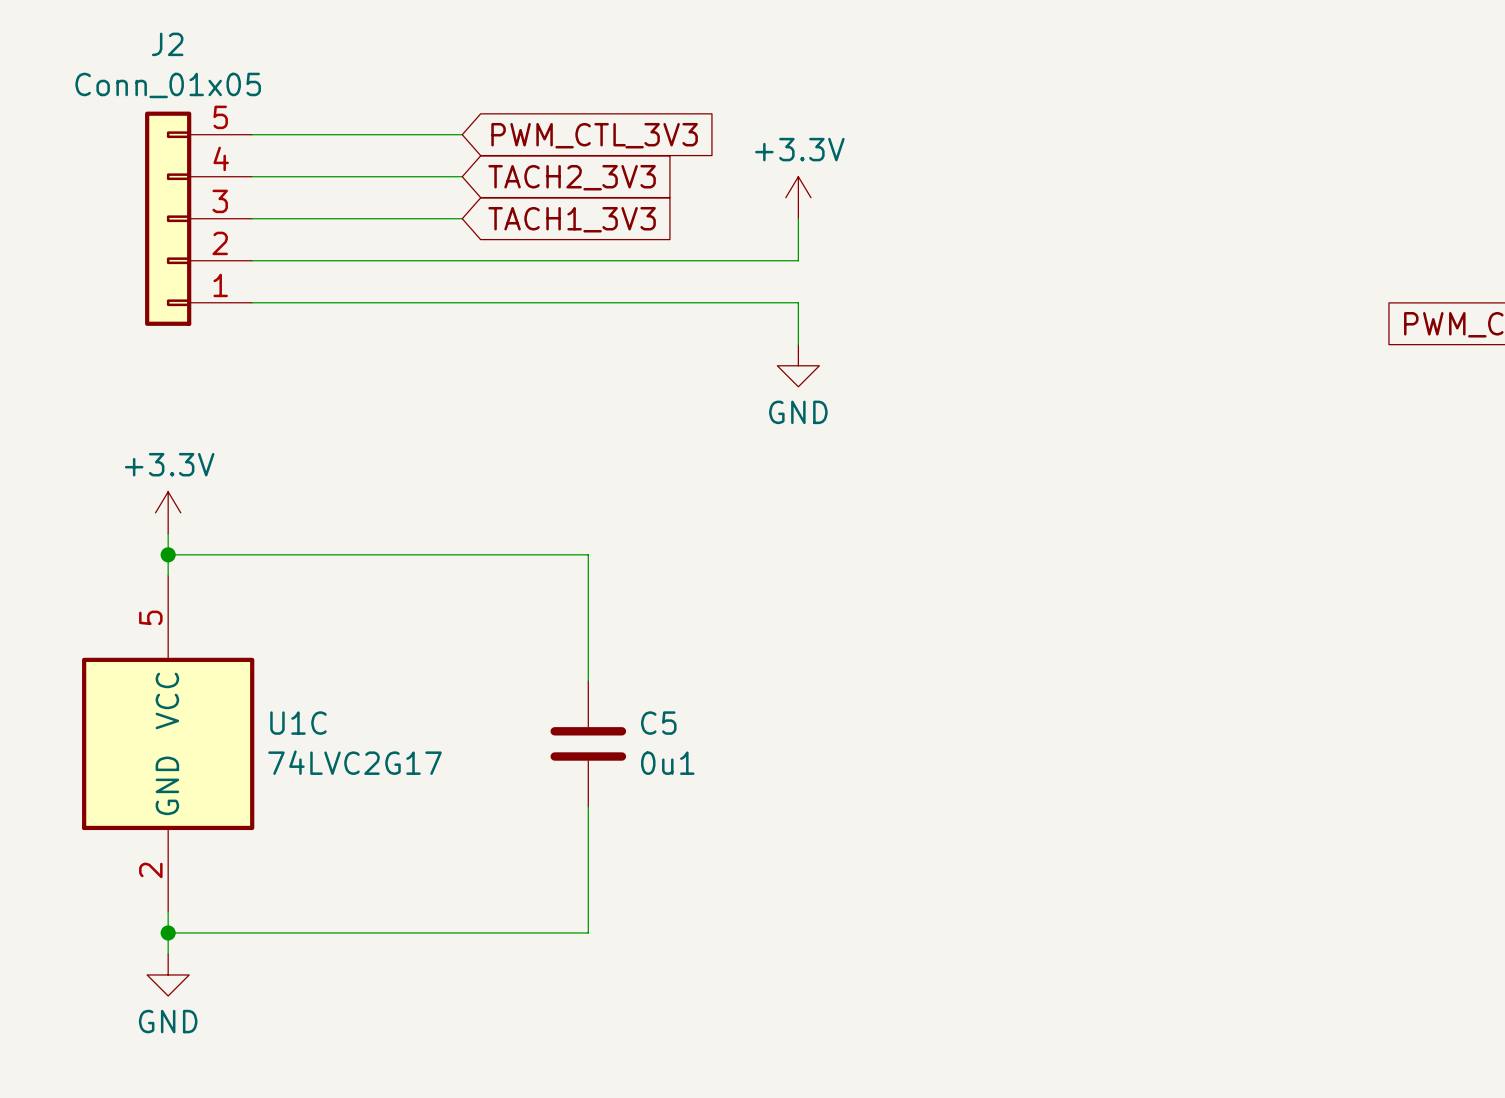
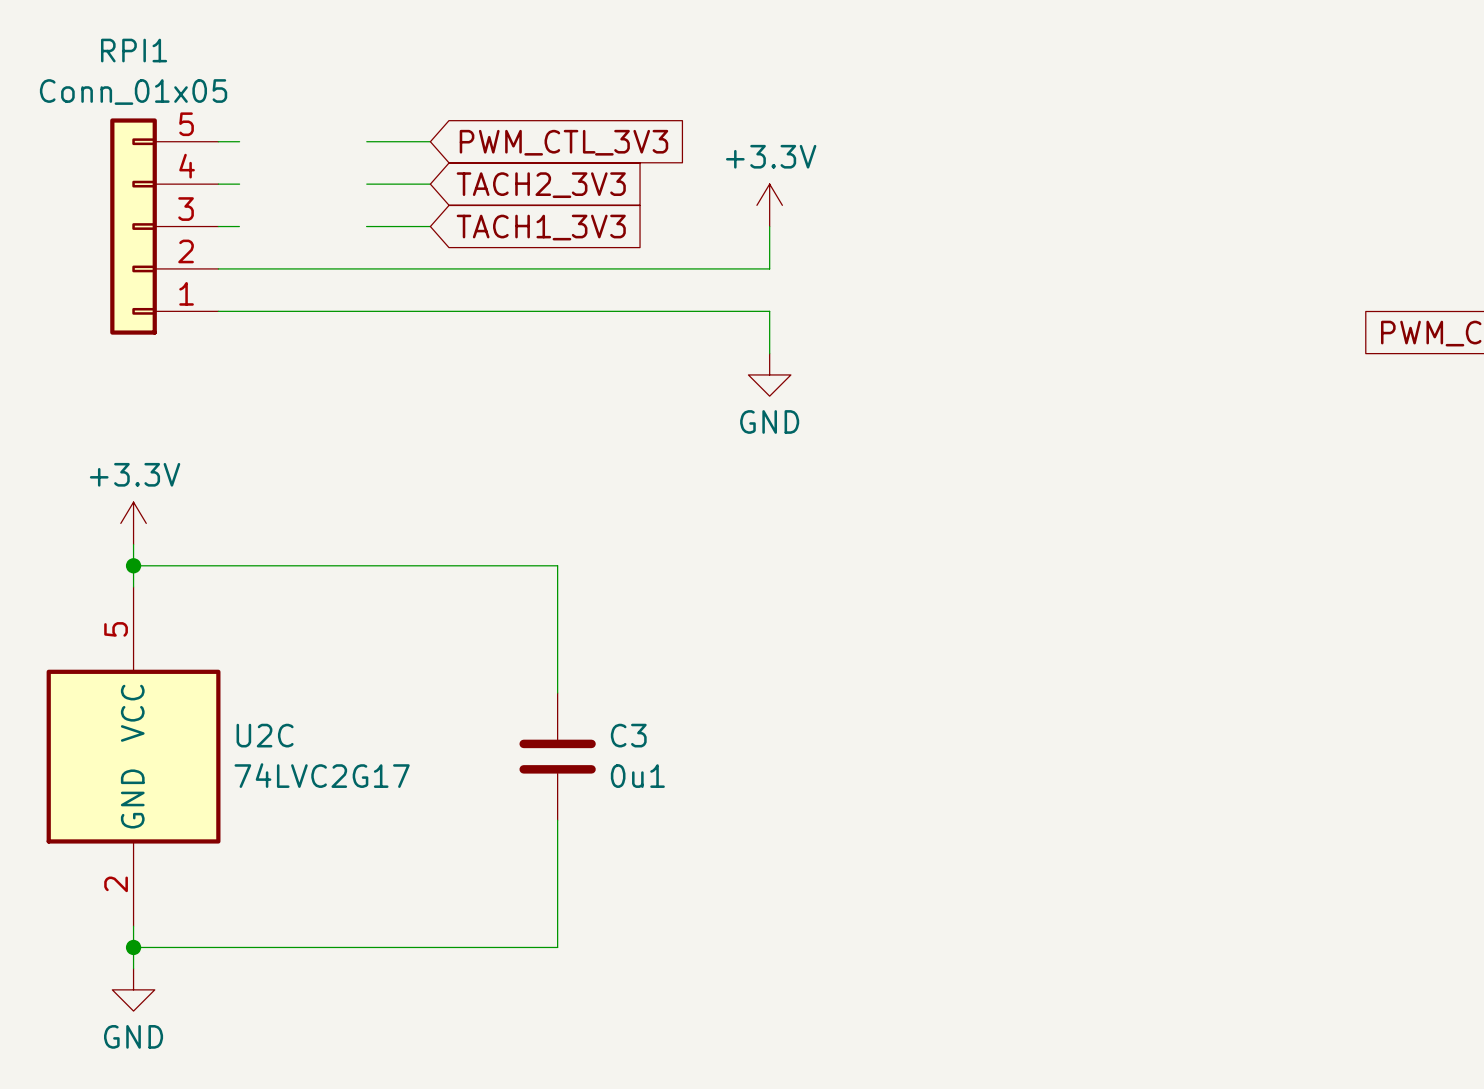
J2 name: J2 (167, 44) -> RPI1 (134, 50)
wire: (273, 134) (399, 134) -> none
wire: (273, 176) (399, 176) -> none
wire: (273, 218) (399, 218) -> none
U1C name: U1C (298, 723) -> U2C (265, 735)
C5 name: C5 (658, 723) -> C3 (628, 735)

